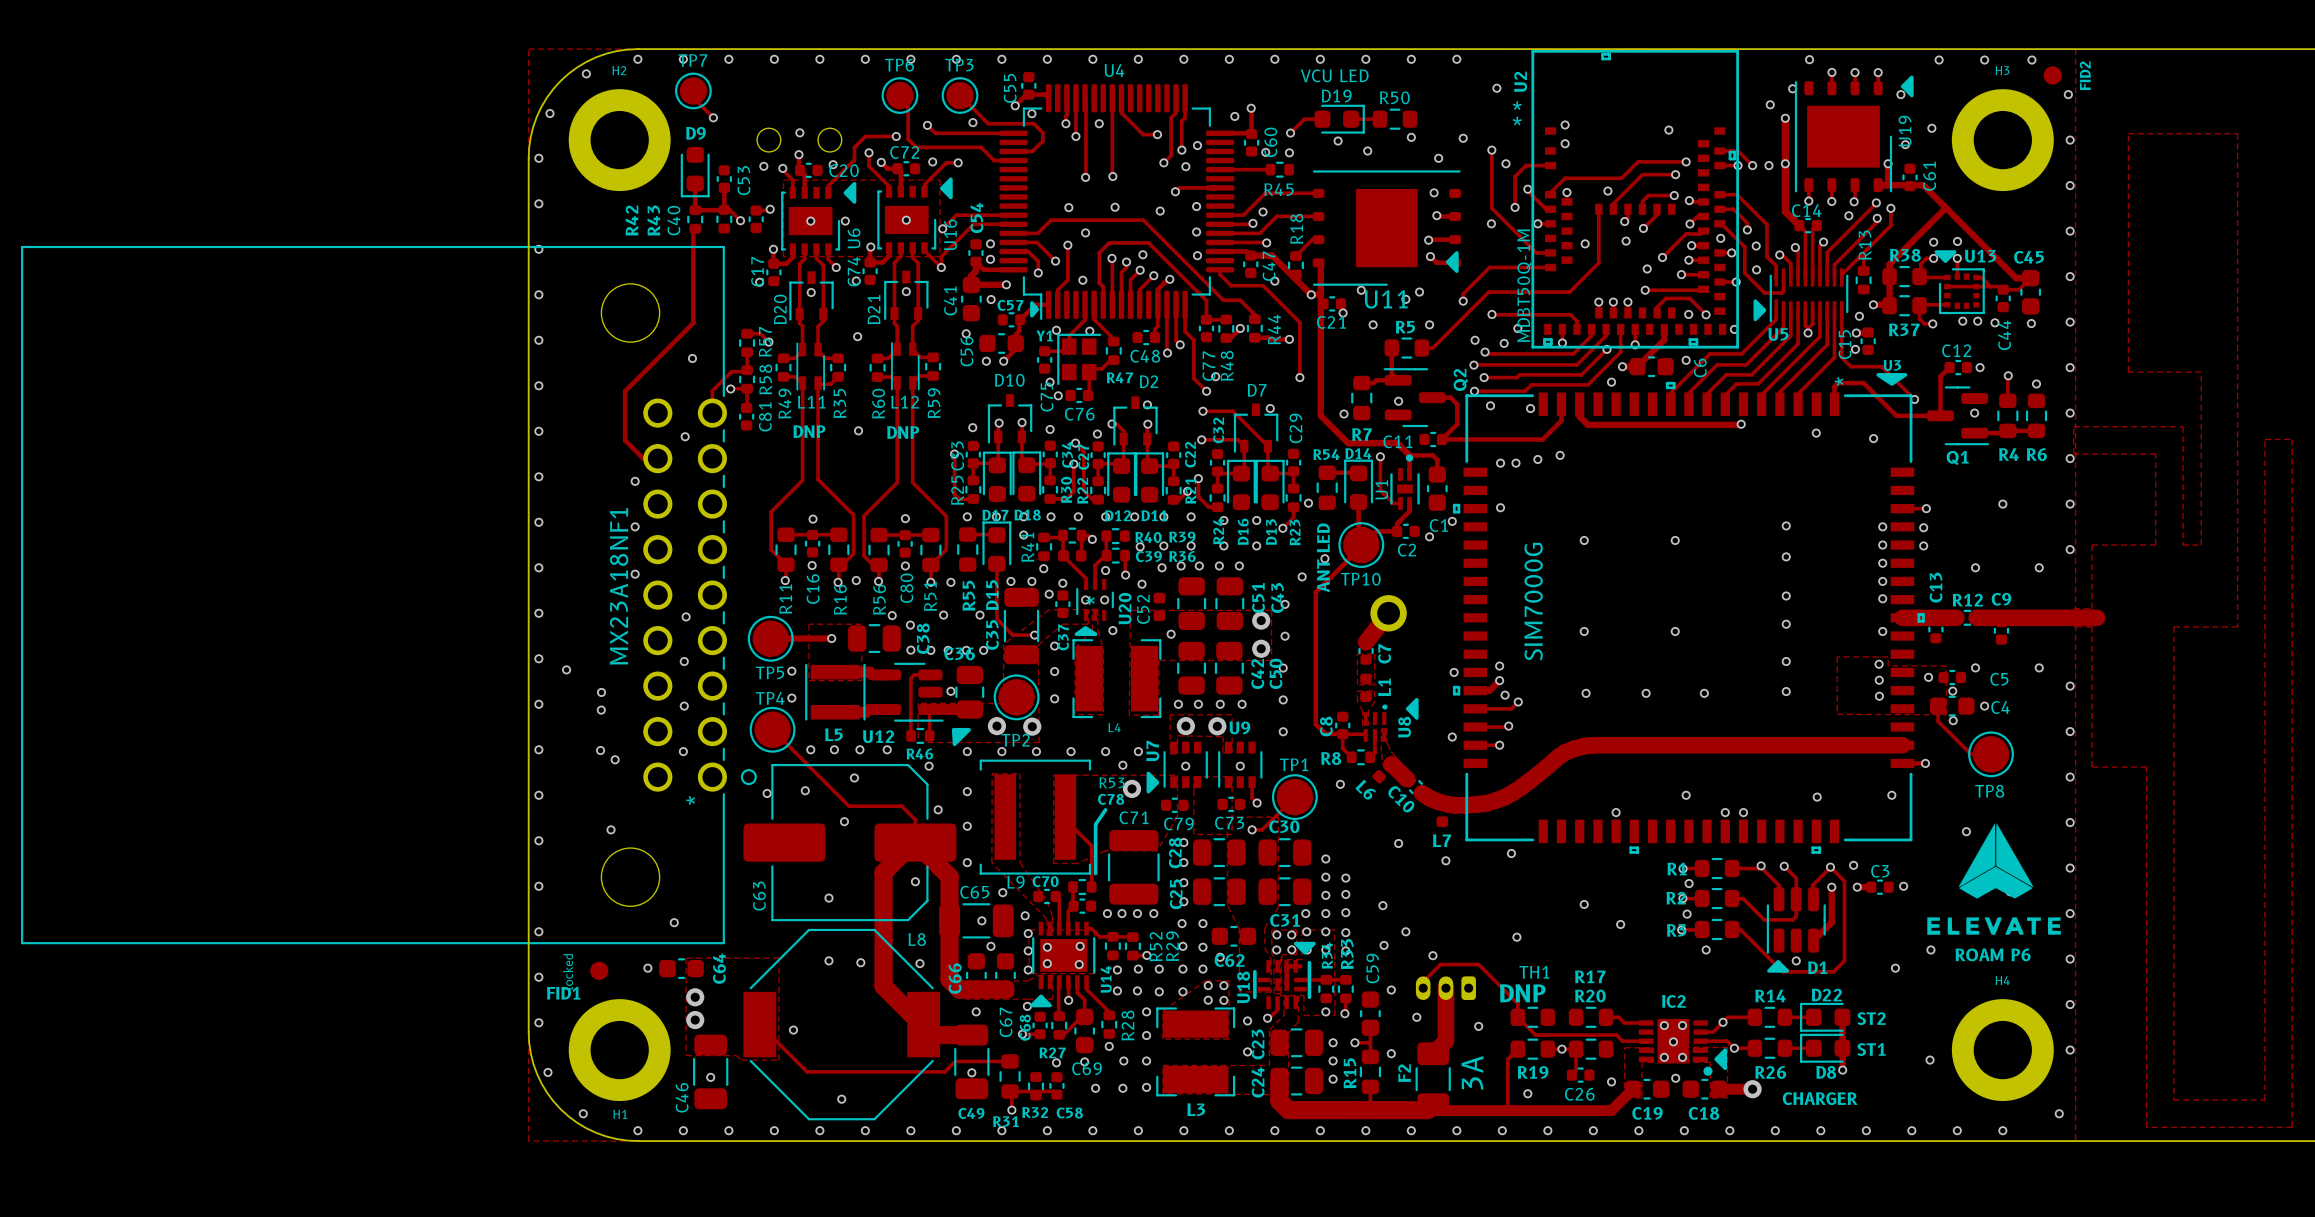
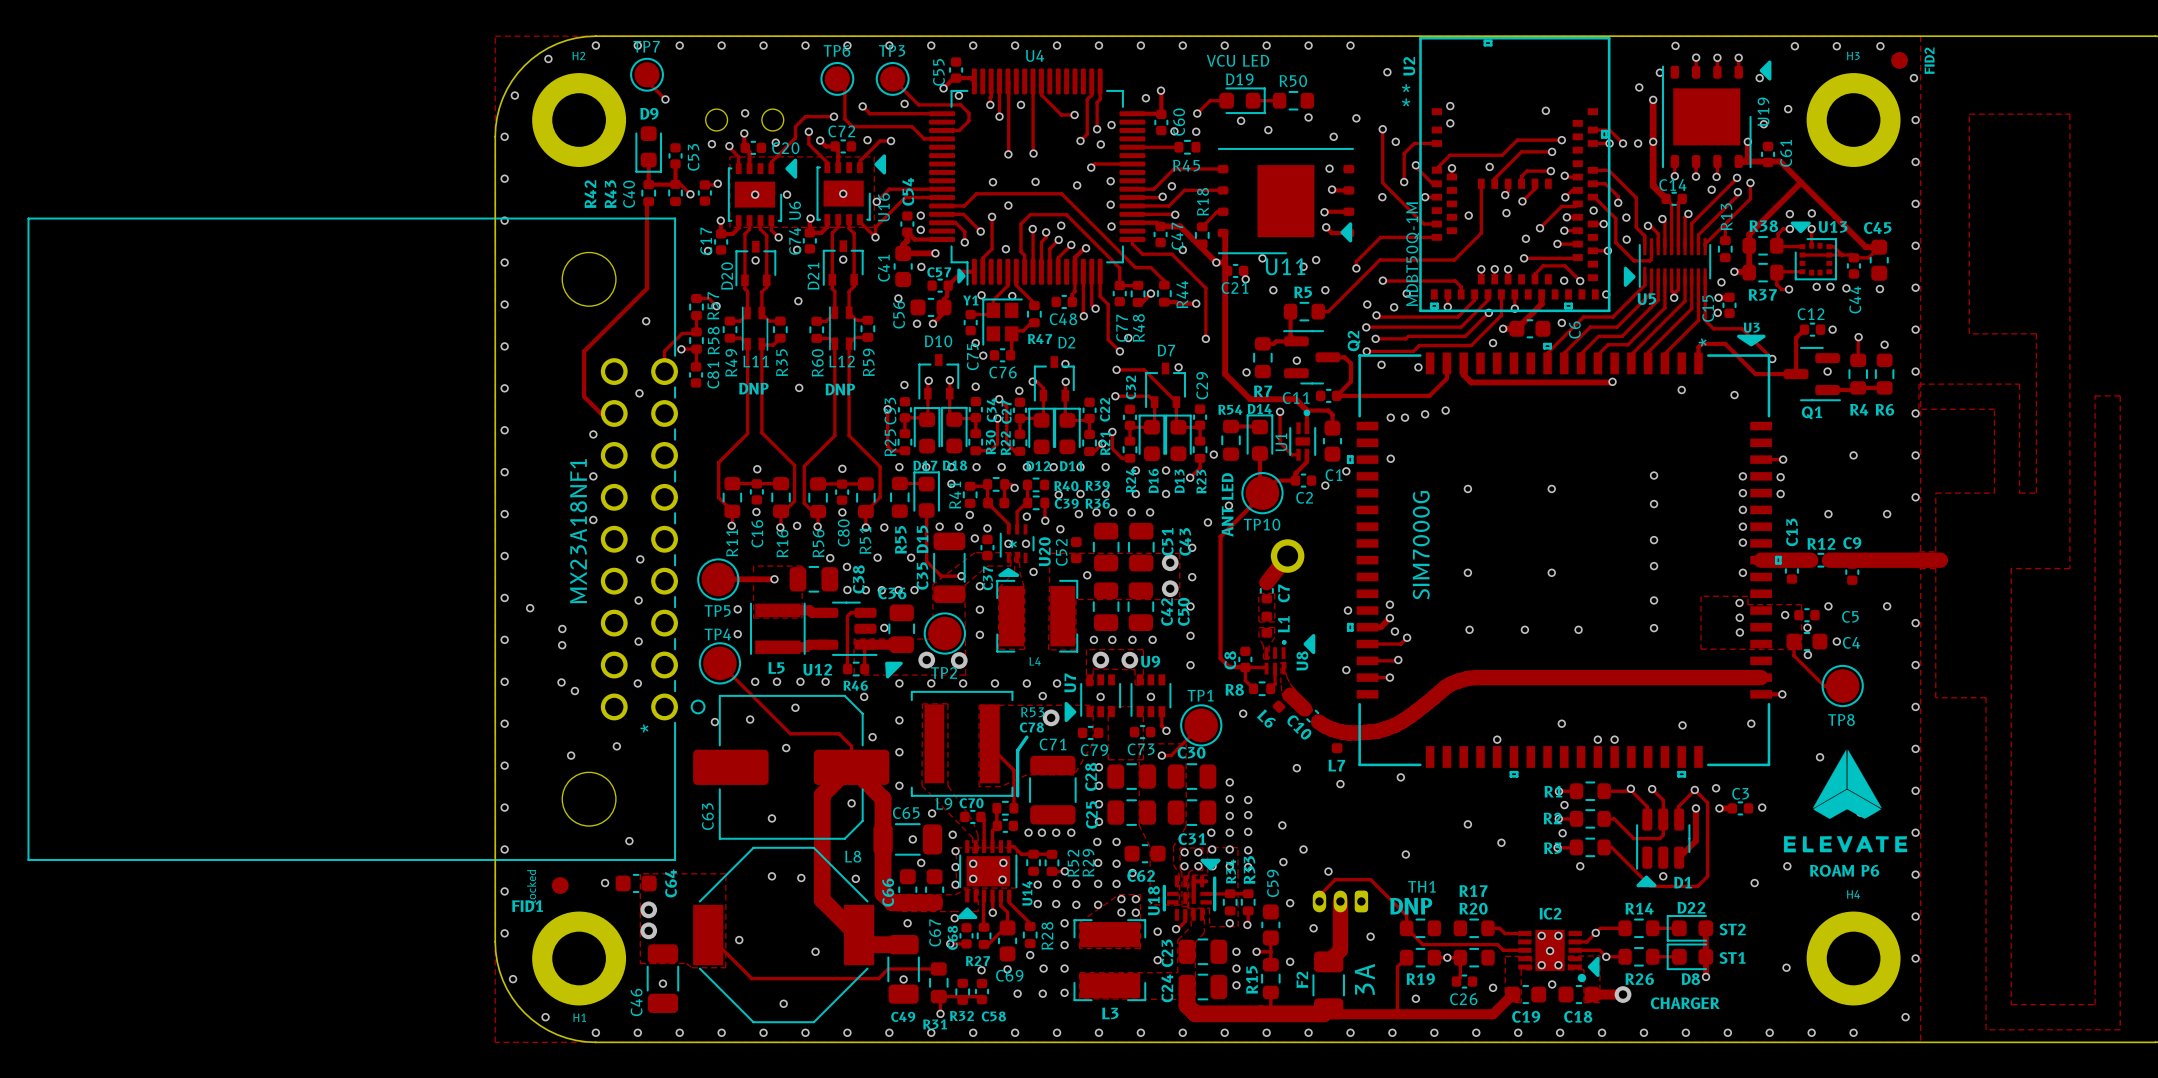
via: none -> (616, 746)
via: none -> (815, 951)

